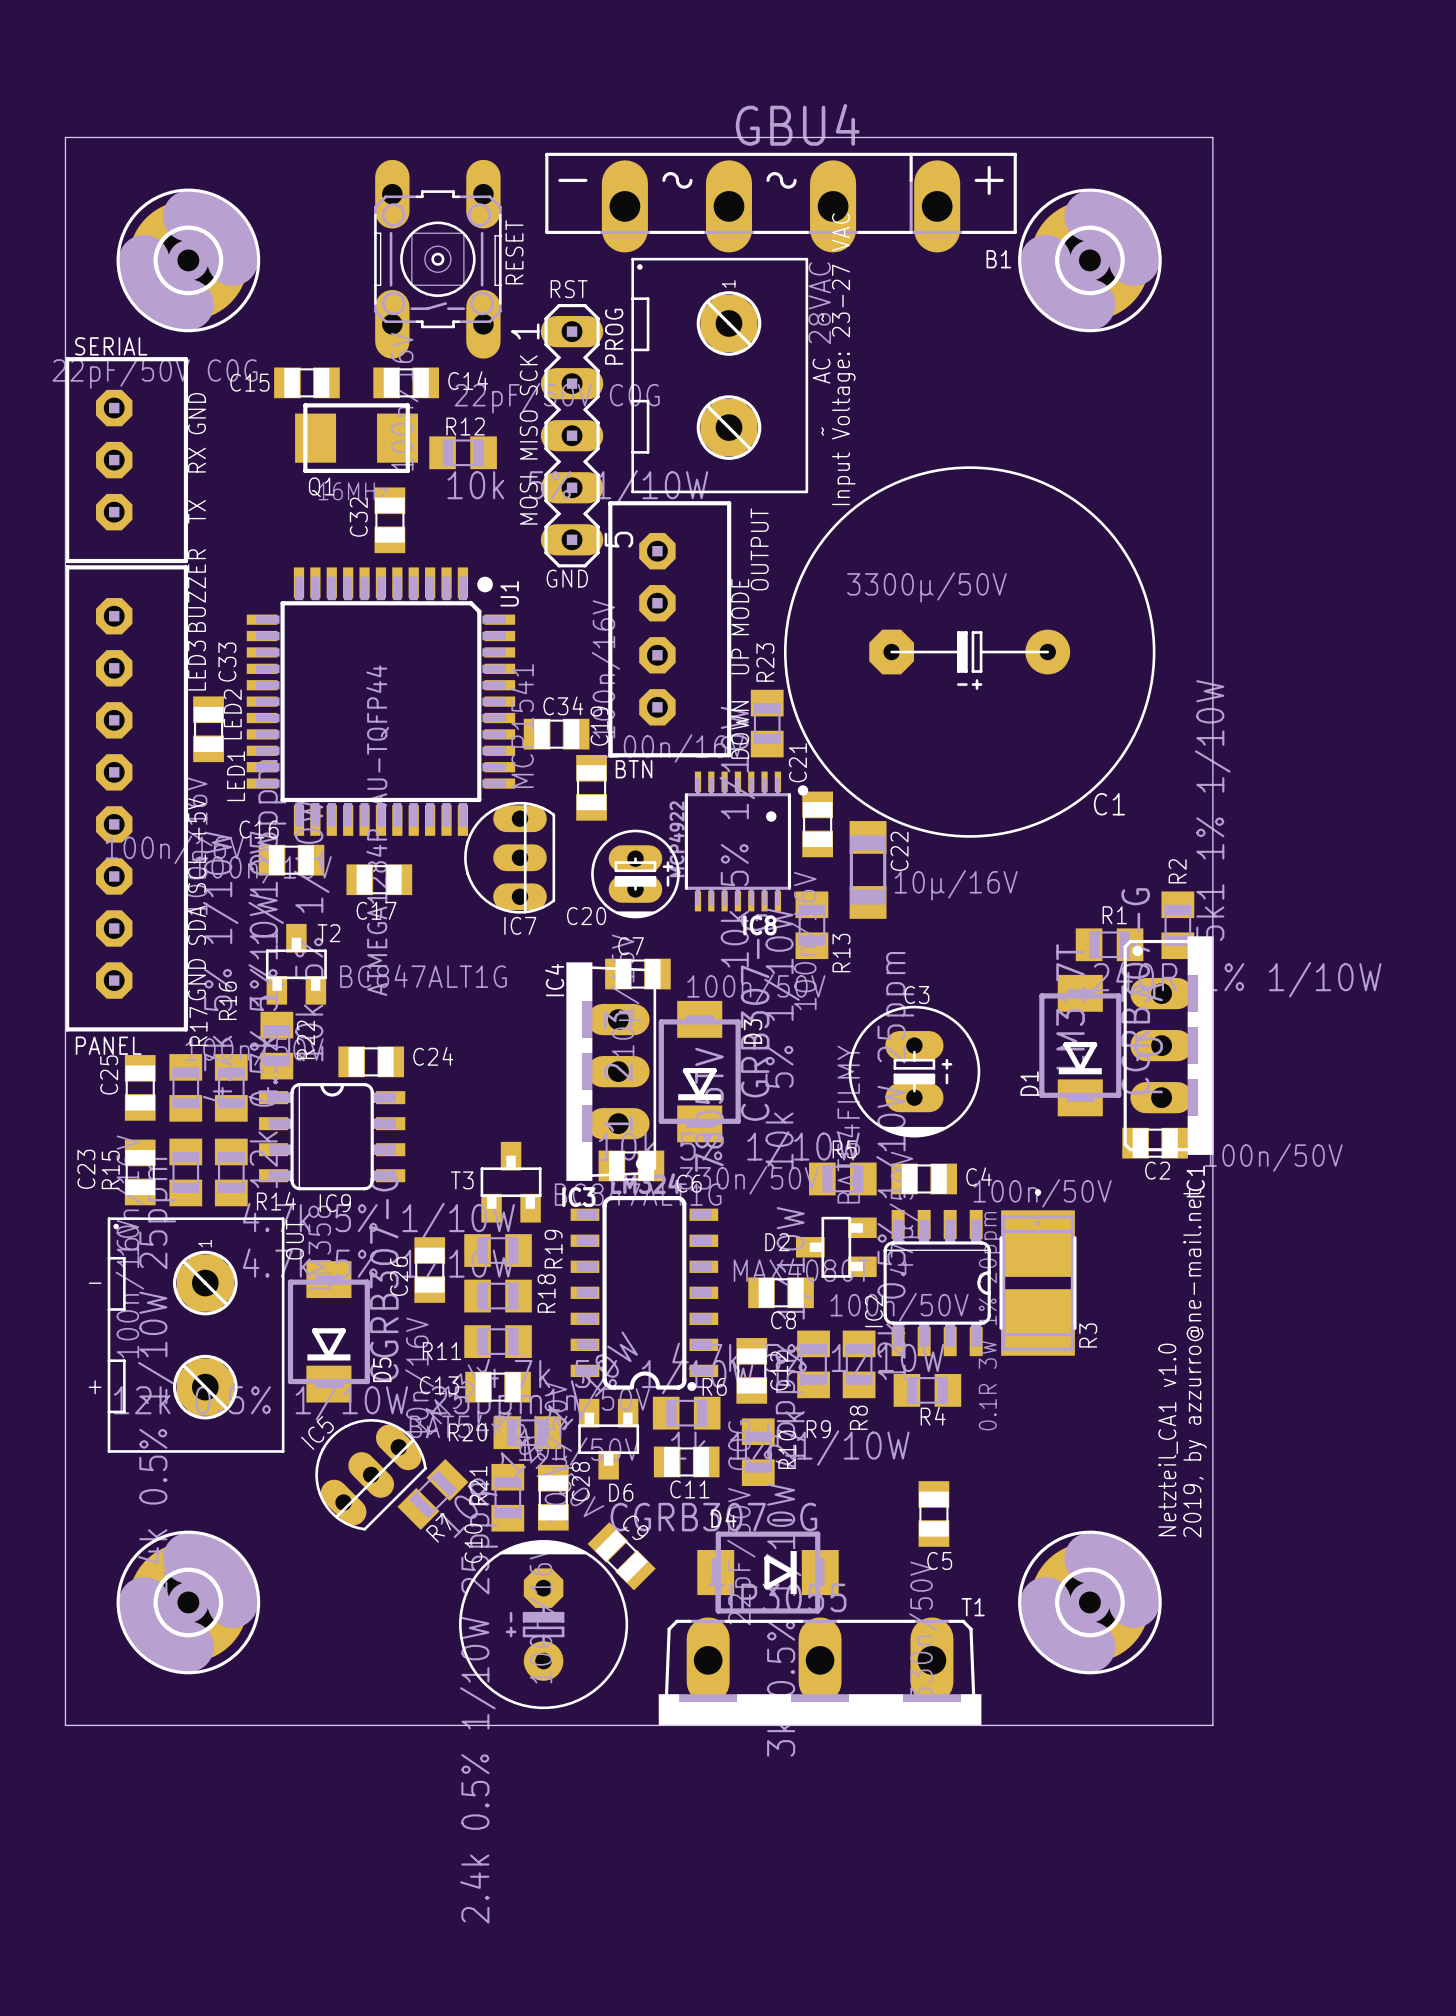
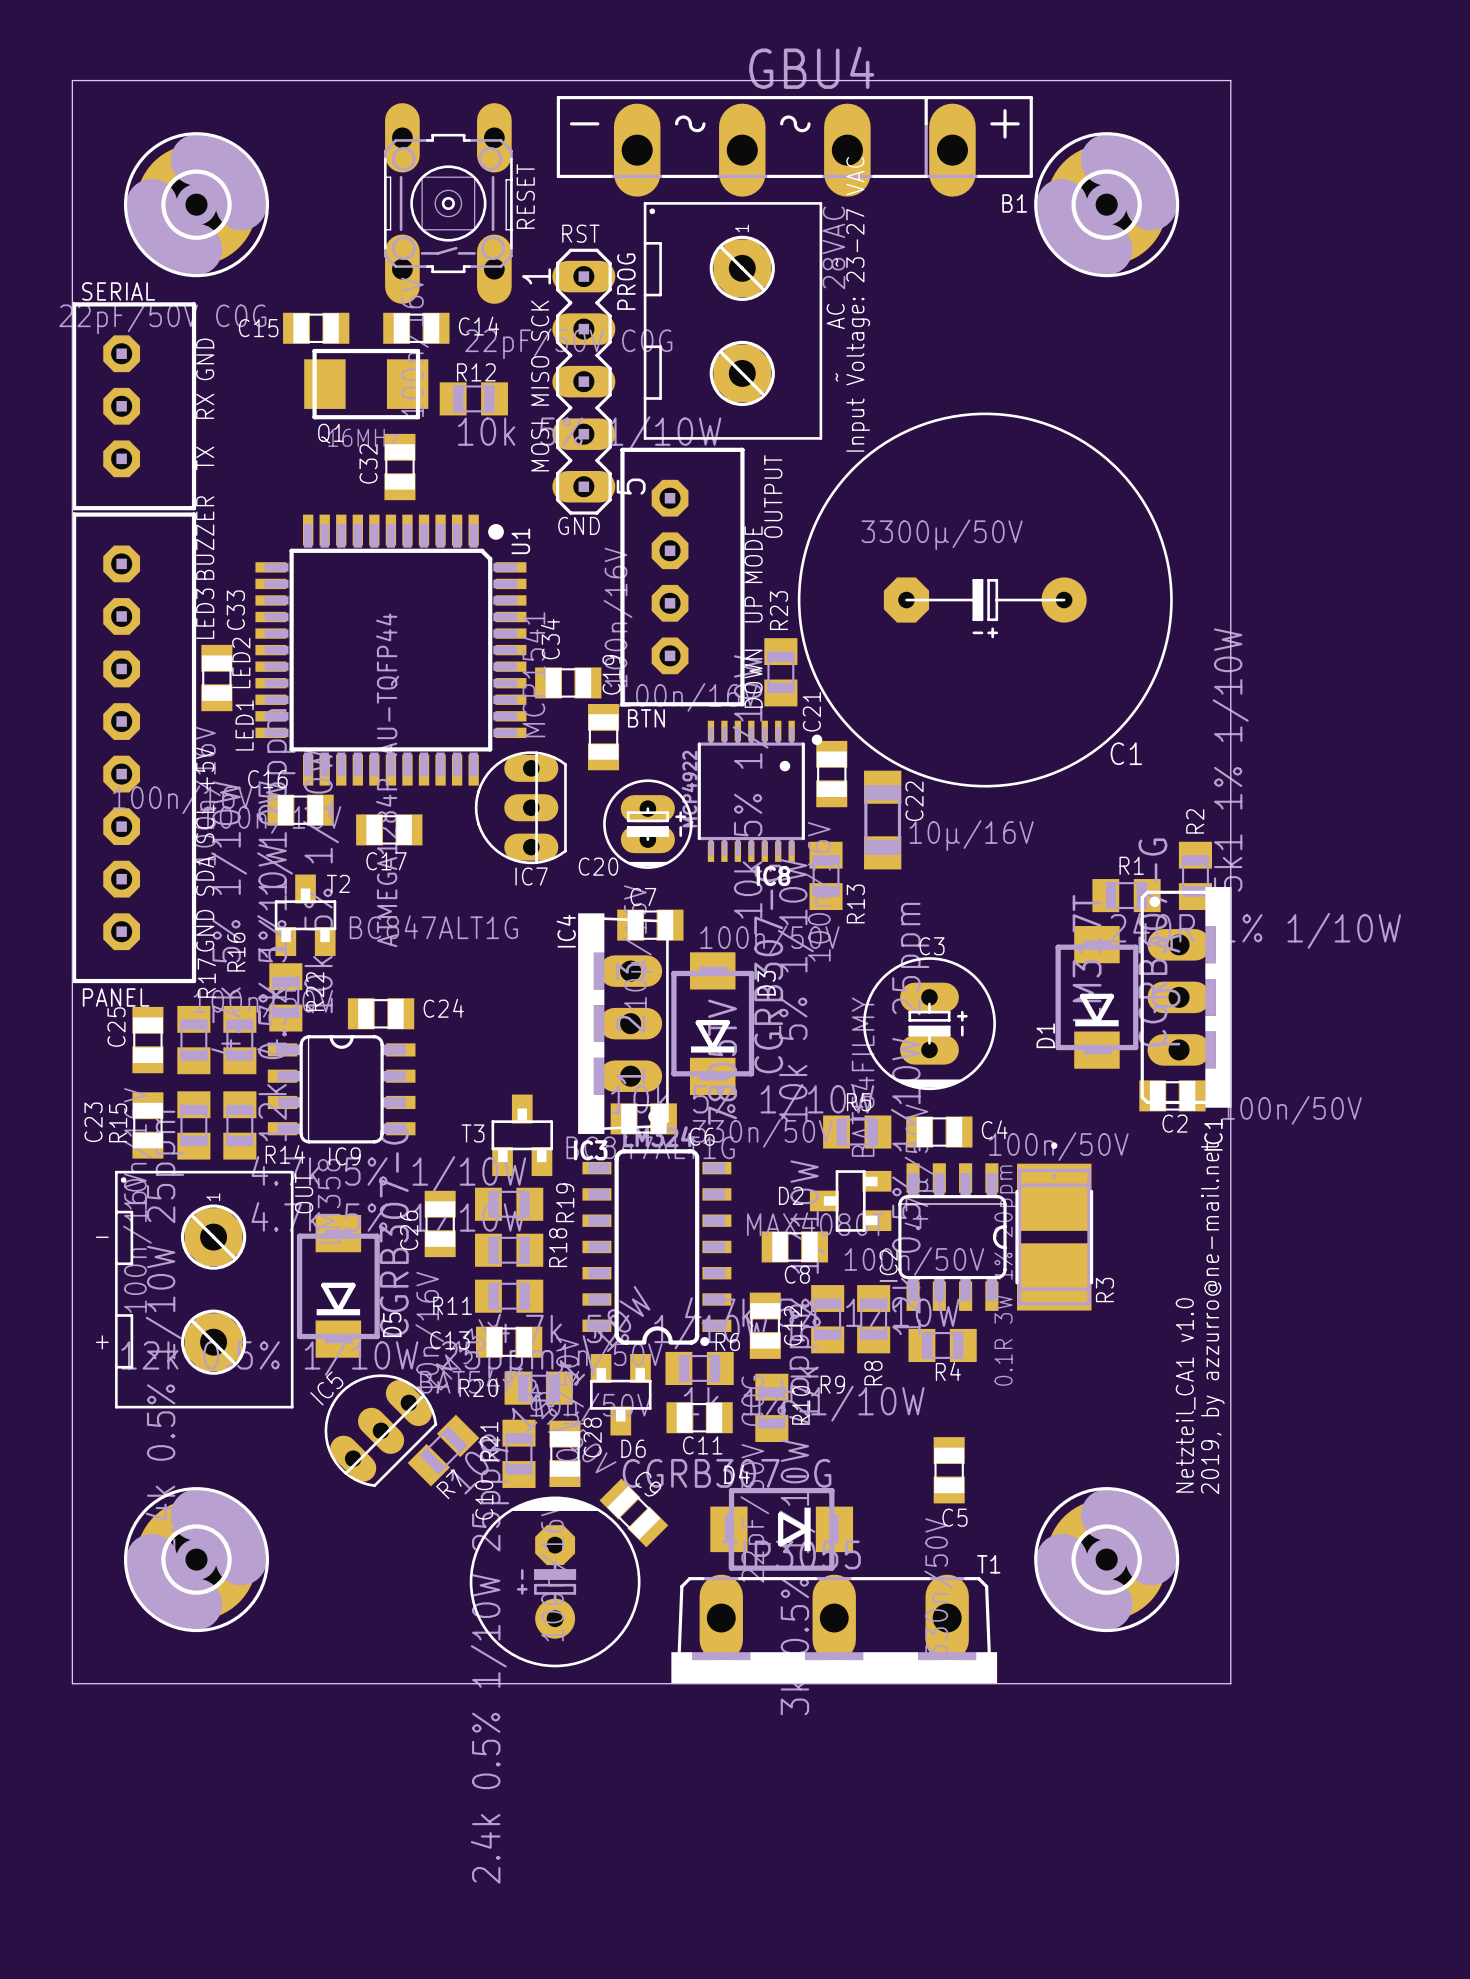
C34 name rotation: 0° (563, 705) -> 90° counterclockwise (550, 639)

